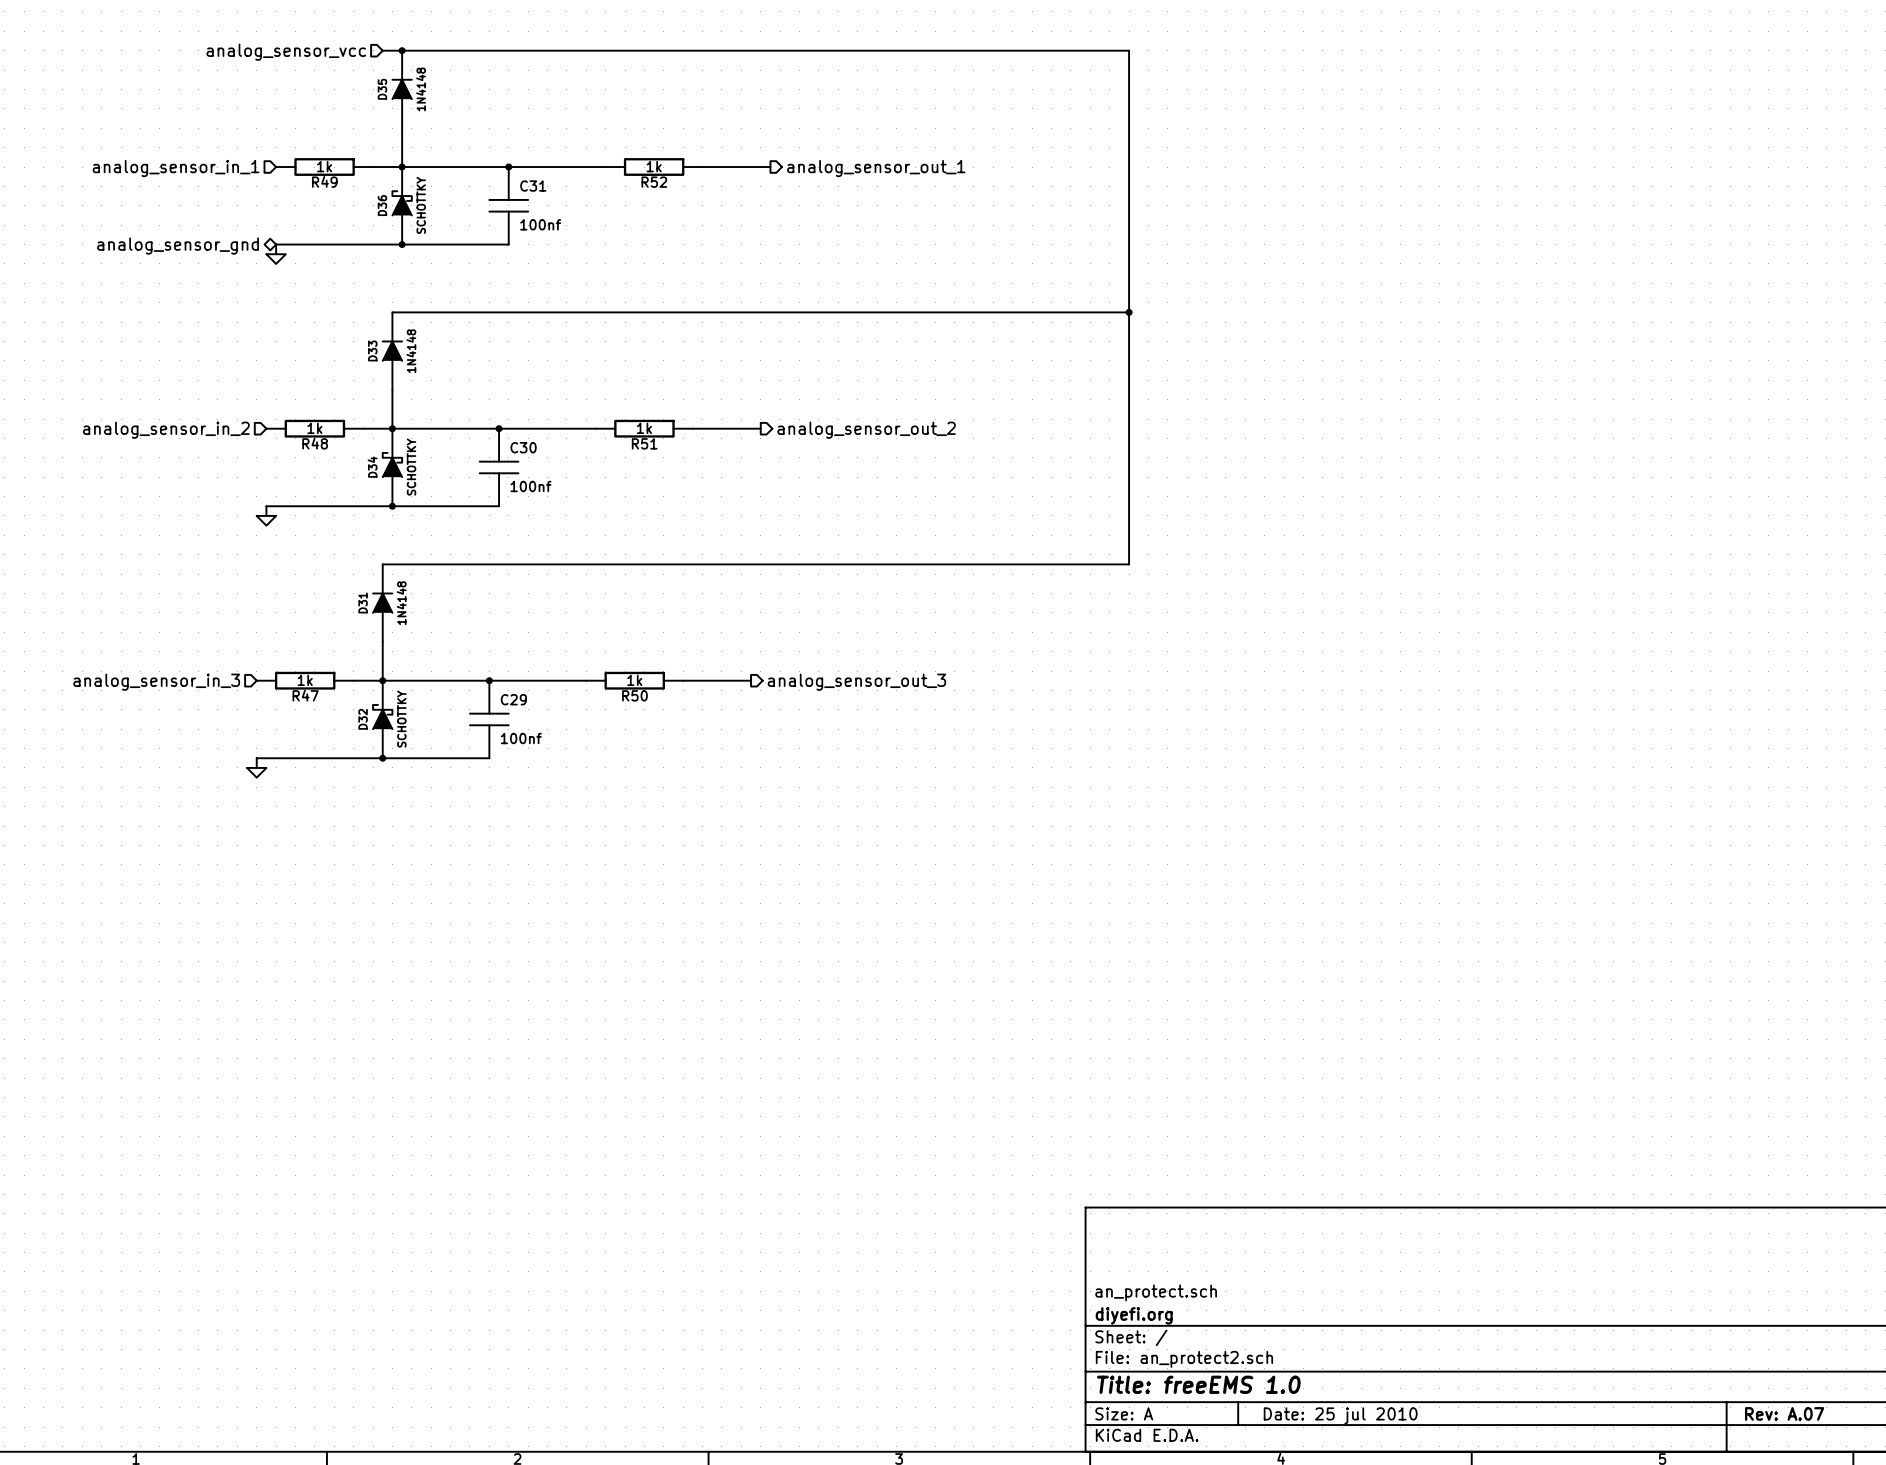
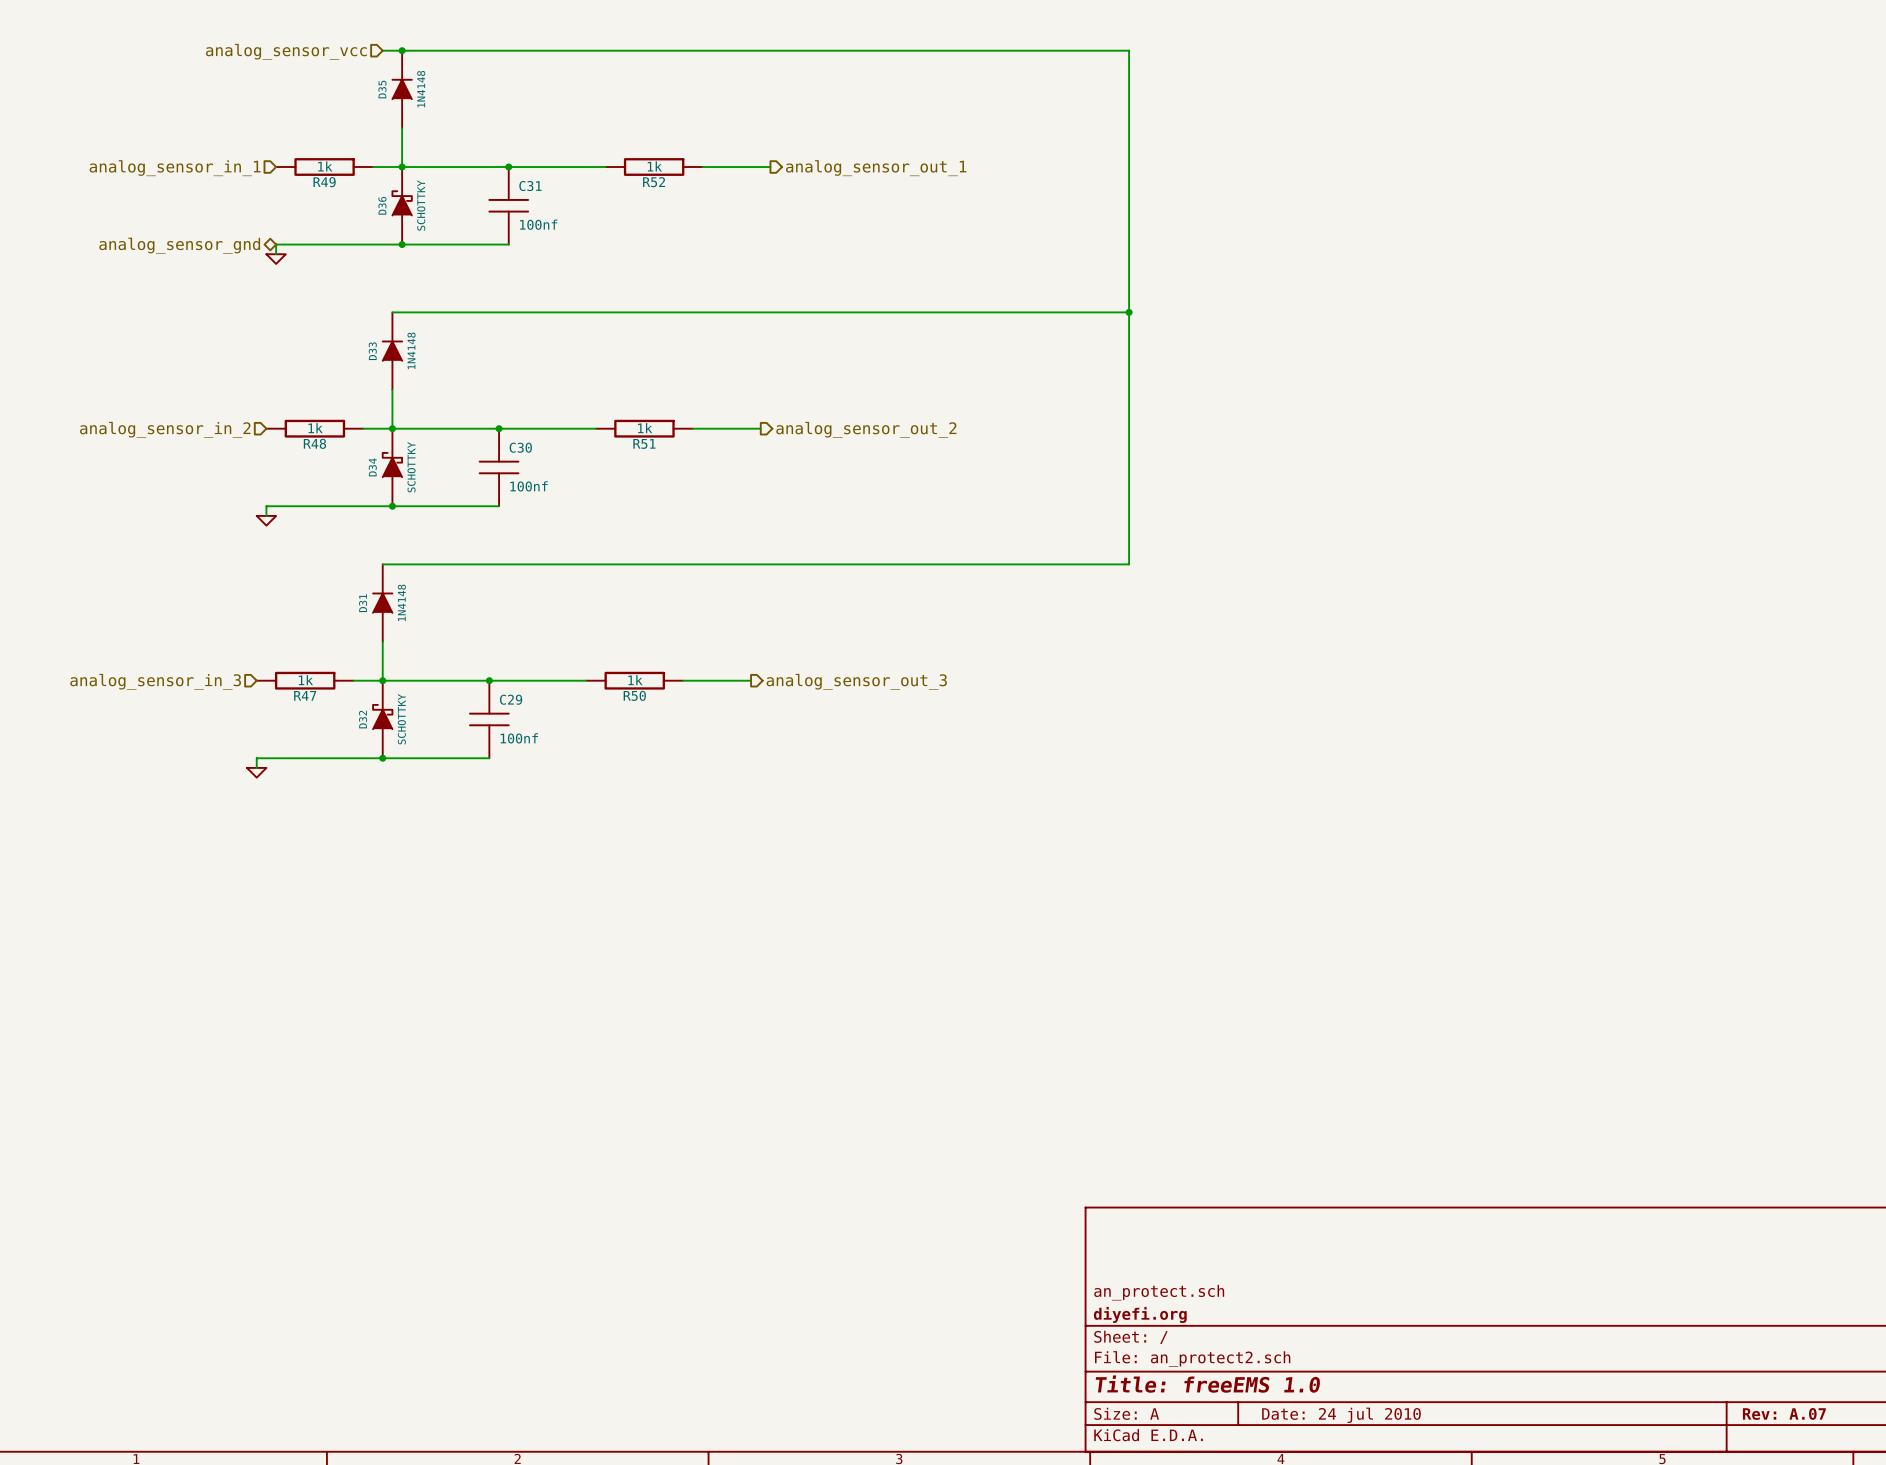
title block: Date: 25 jul 2010 (1340, 1415) -> Date: 24 jul 2010 (1341, 1415)

